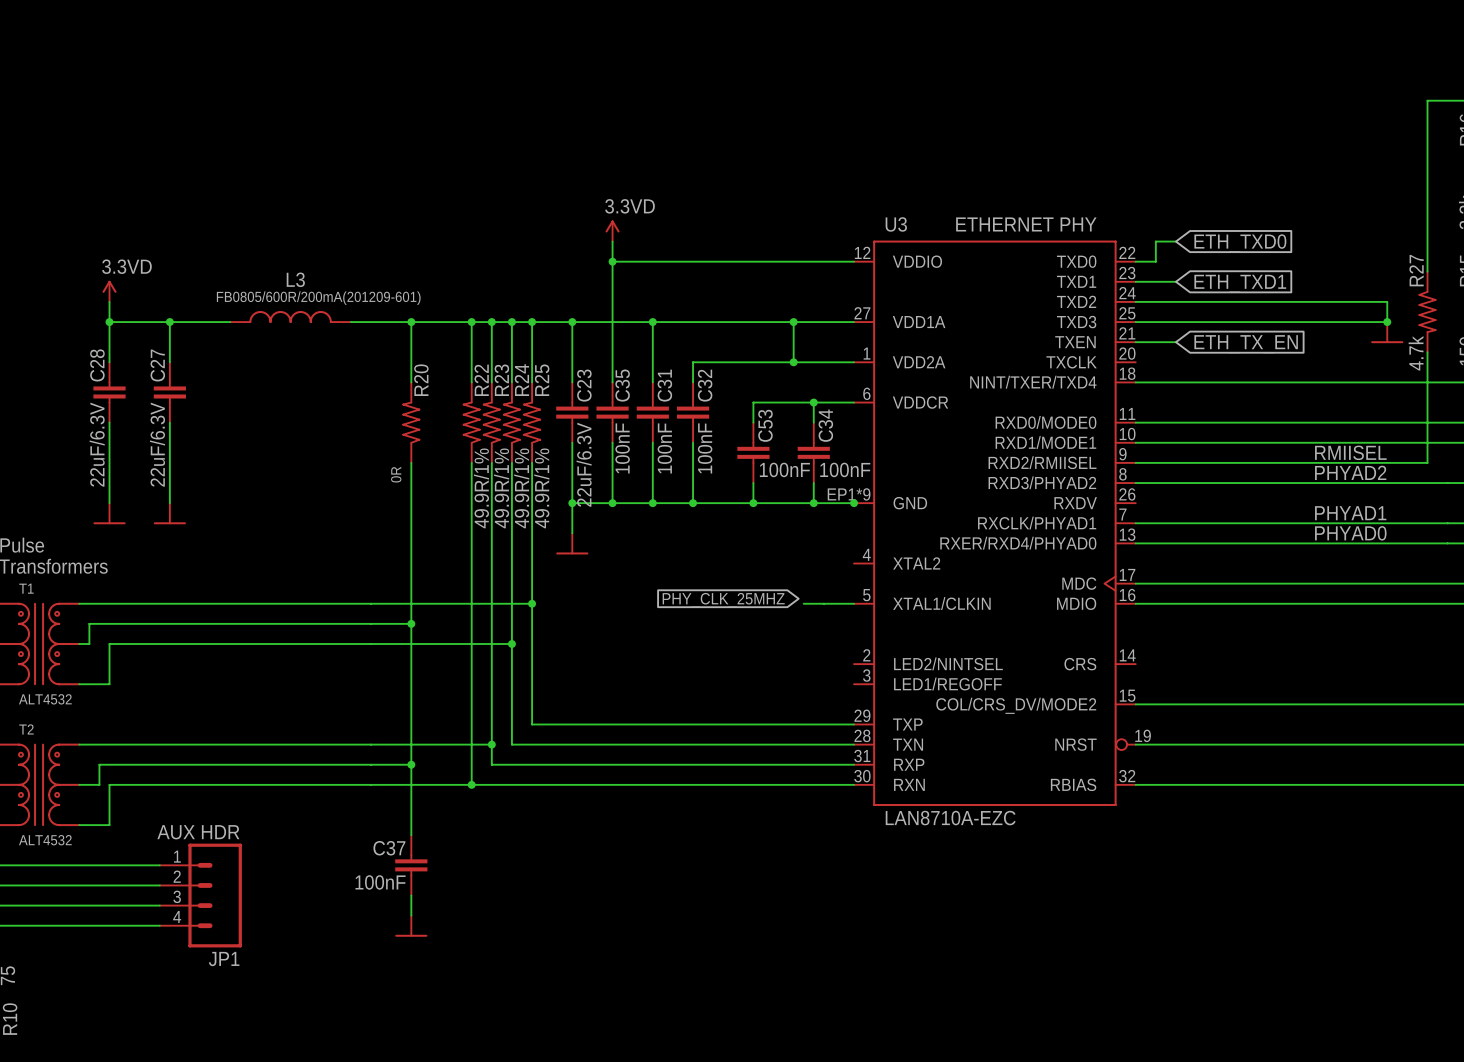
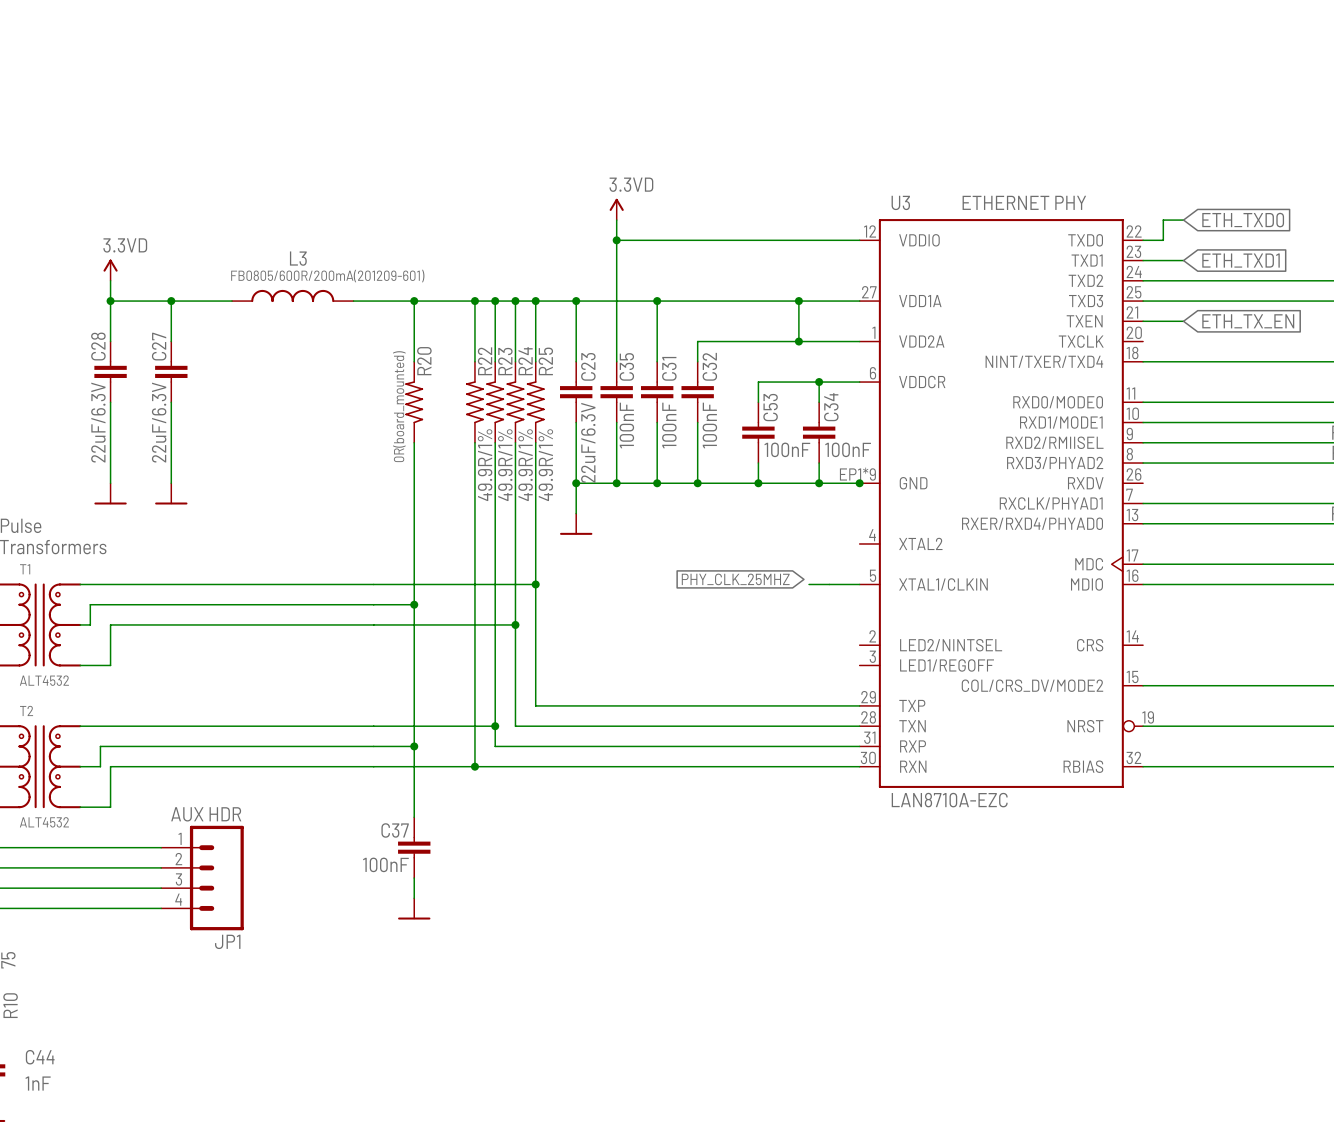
R20 value: 0R (396, 474) -> 0R(board_mounted) (399, 406)

